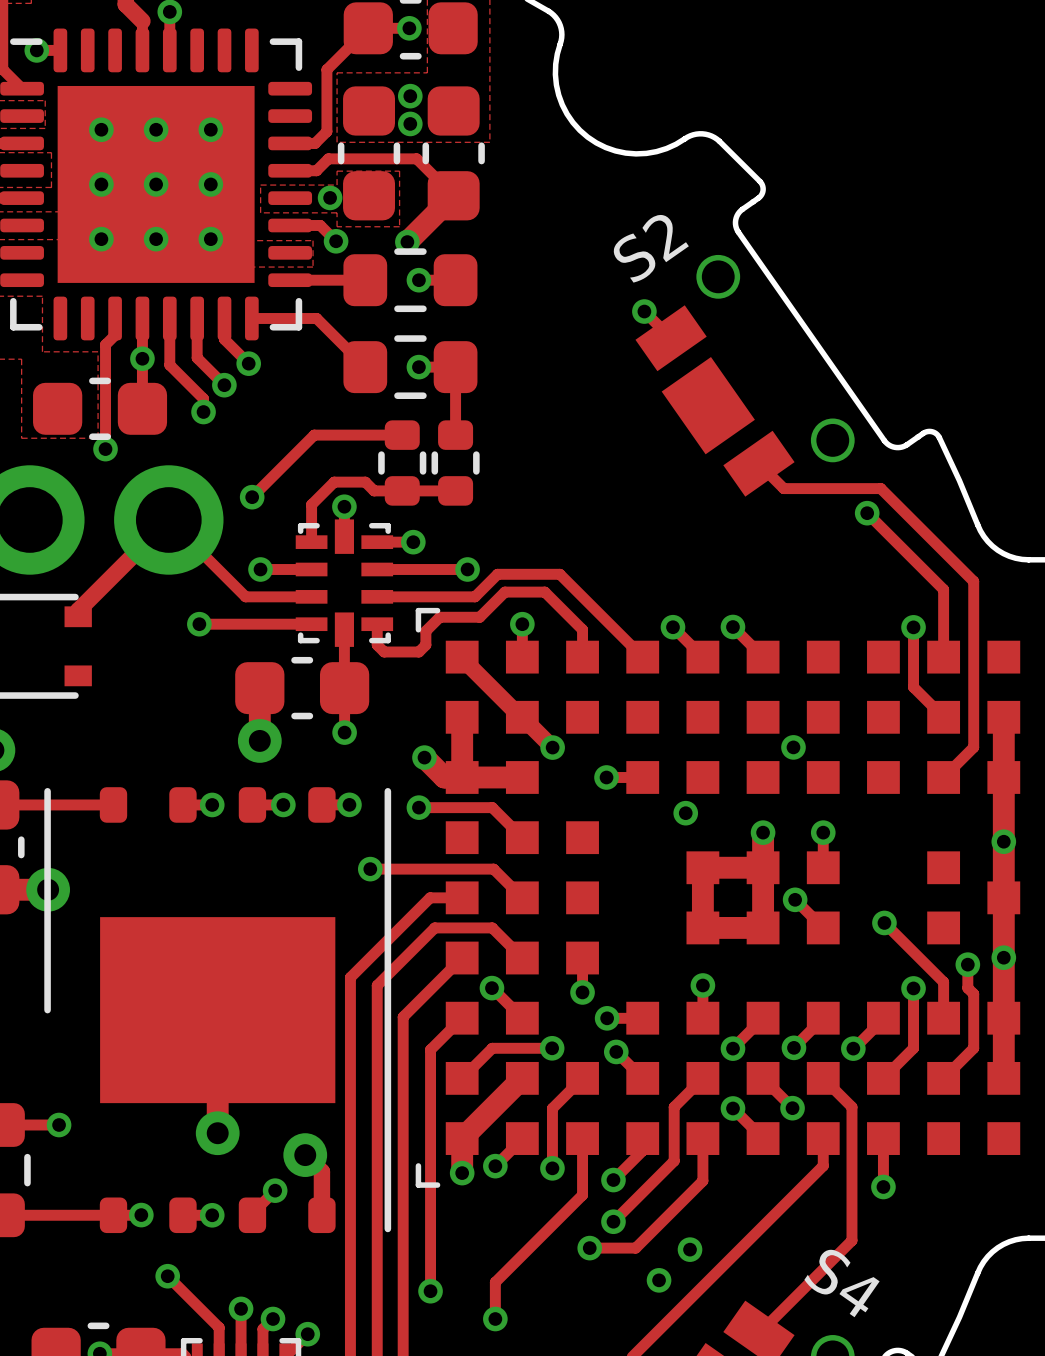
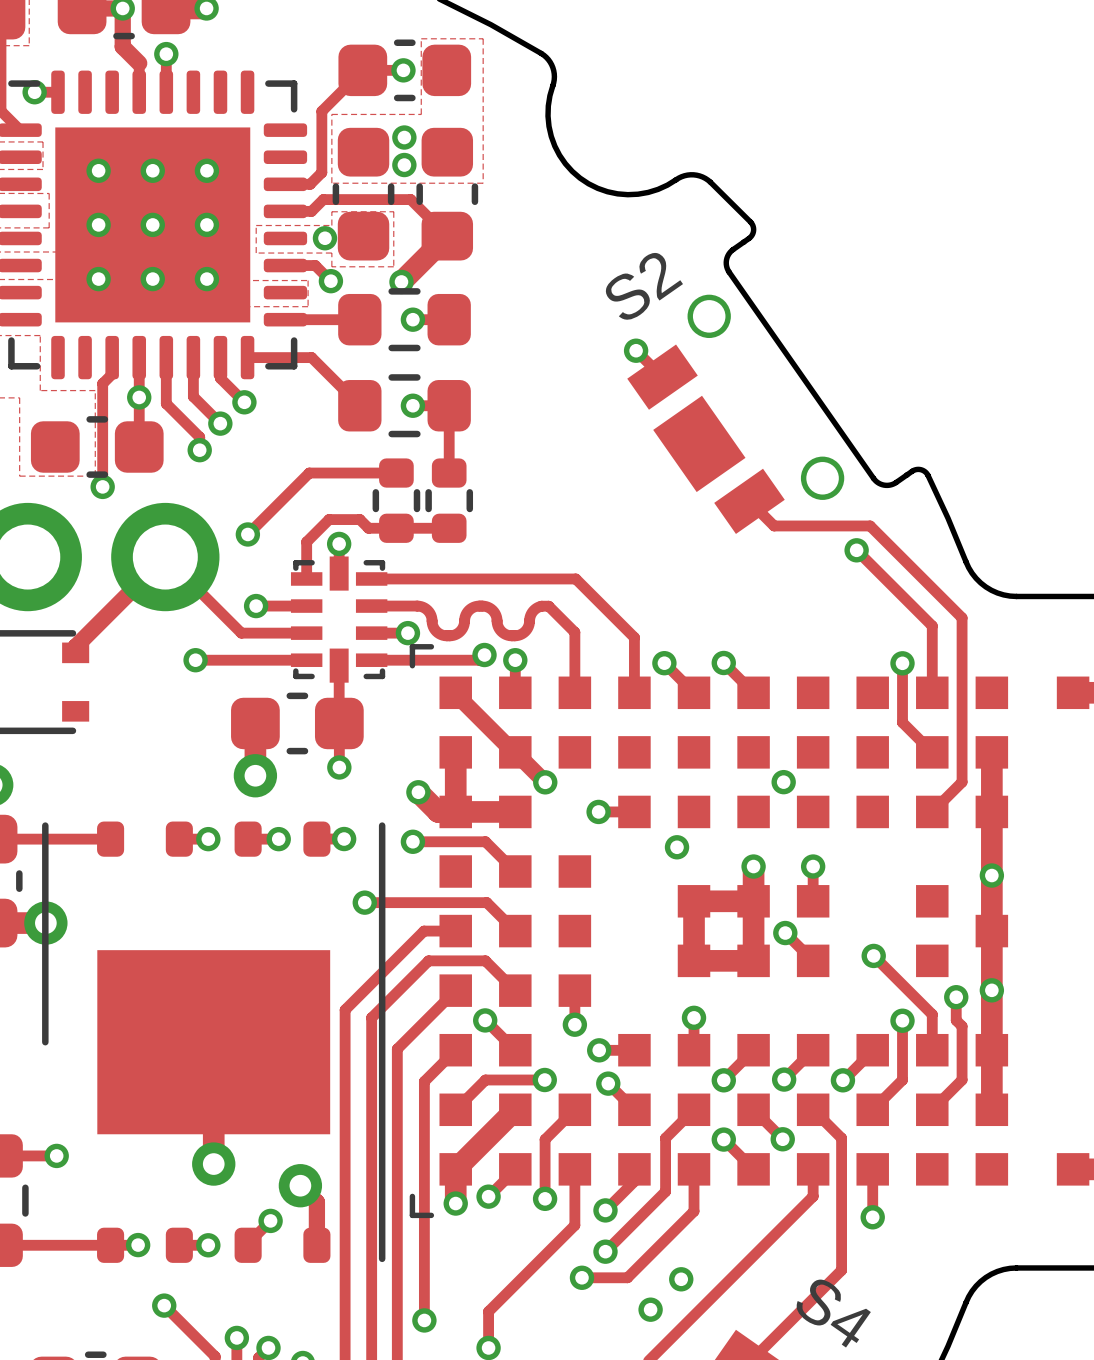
via: (413, 542) -> none
track: (423, 569) (467, 569) -> none
via: (467, 569) -> none
track: (413, 596) (475, 596) (497, 574) (559, 574) (642, 657) -> (407, 578) (575, 578) (634, 637) (634, 692)
via: none -> (407, 633)
track: none -> (484, 655) (479, 660) (371, 660)
via: none -> (484, 655)
track: (377, 624) (377, 645) (384, 651) (418, 651) (425, 645) (425, 631) (439, 617) (479, 617) (504, 592) (544, 592) (582, 629) -> (417, 606) (424, 608) (429, 611) (436, 631) (446, 635) (453, 635) (460, 631) (466, 613) (475, 606) (484, 606) (491, 609) (495, 615) (497, 624) (501, 631) (508, 635) (514, 635) (520, 634) (526, 630) (531, 614) (535, 609) (541, 606) (548, 606) (574, 632) (574, 665)

